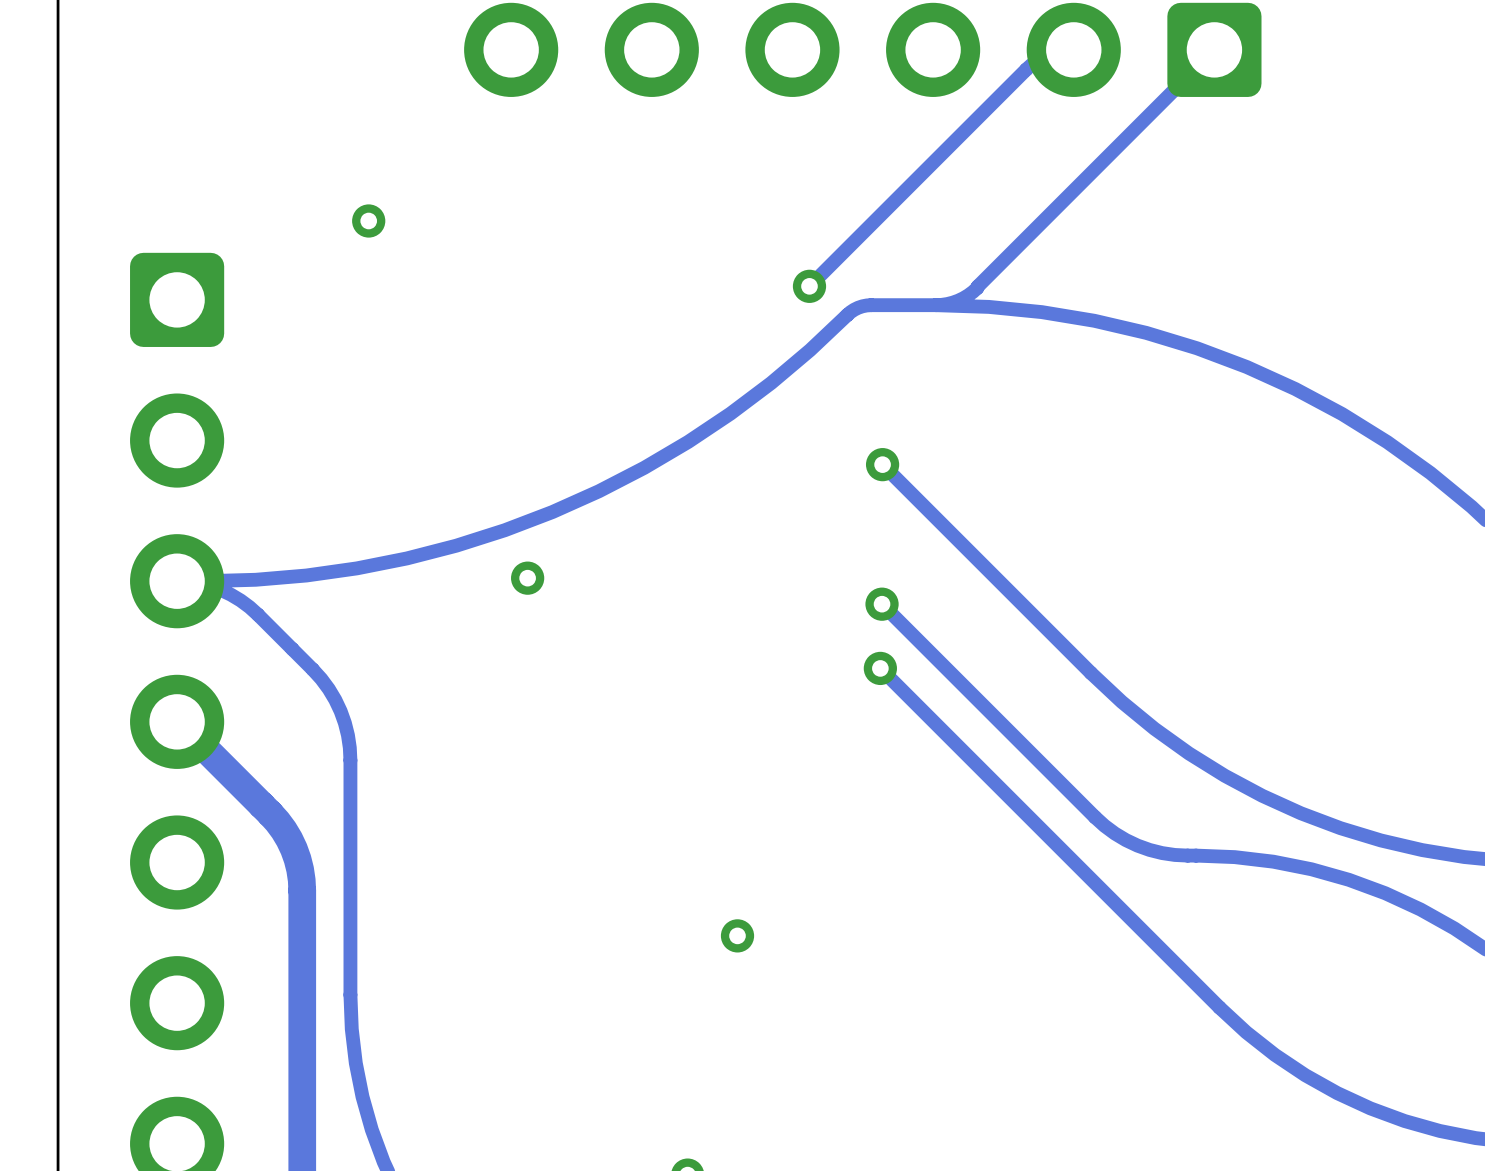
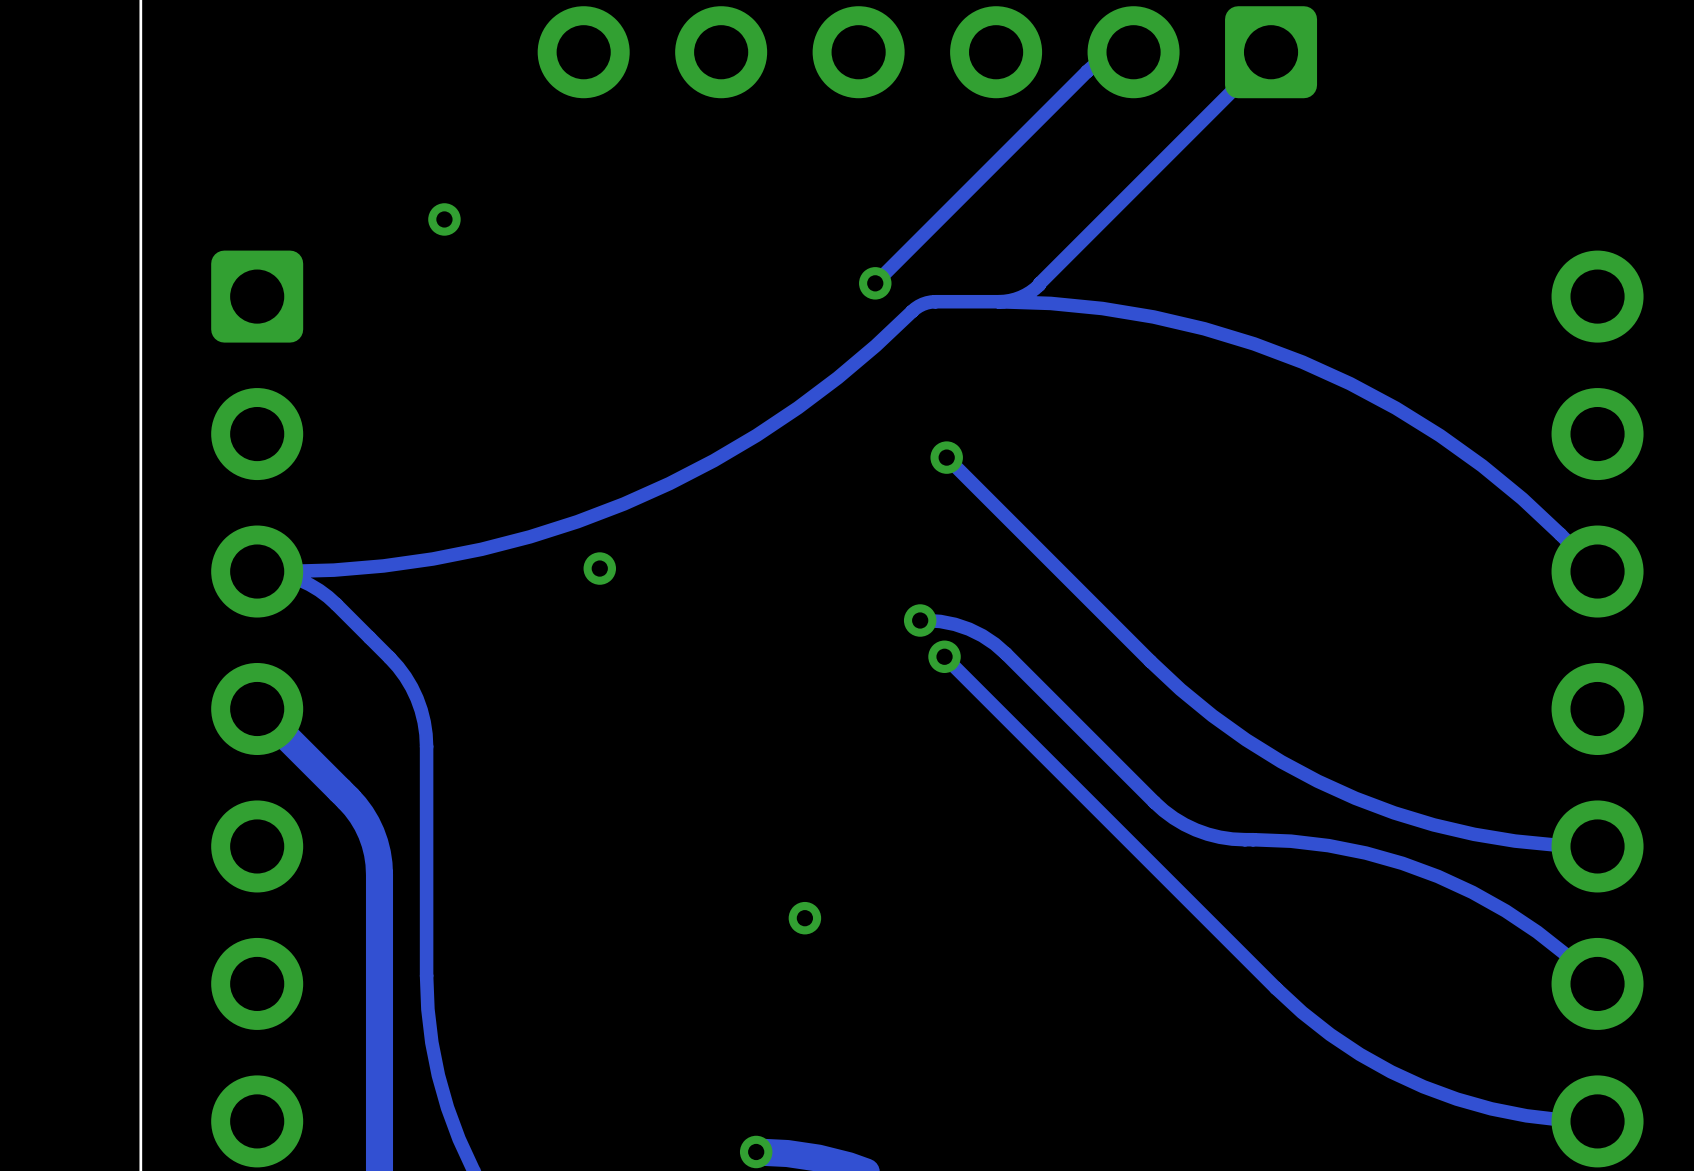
track: (882, 604) (943, 665) -> (920, 620) (940, 621) (969, 629) (982, 635) (1005, 653)
via position: (882, 604) -> (920, 620)

